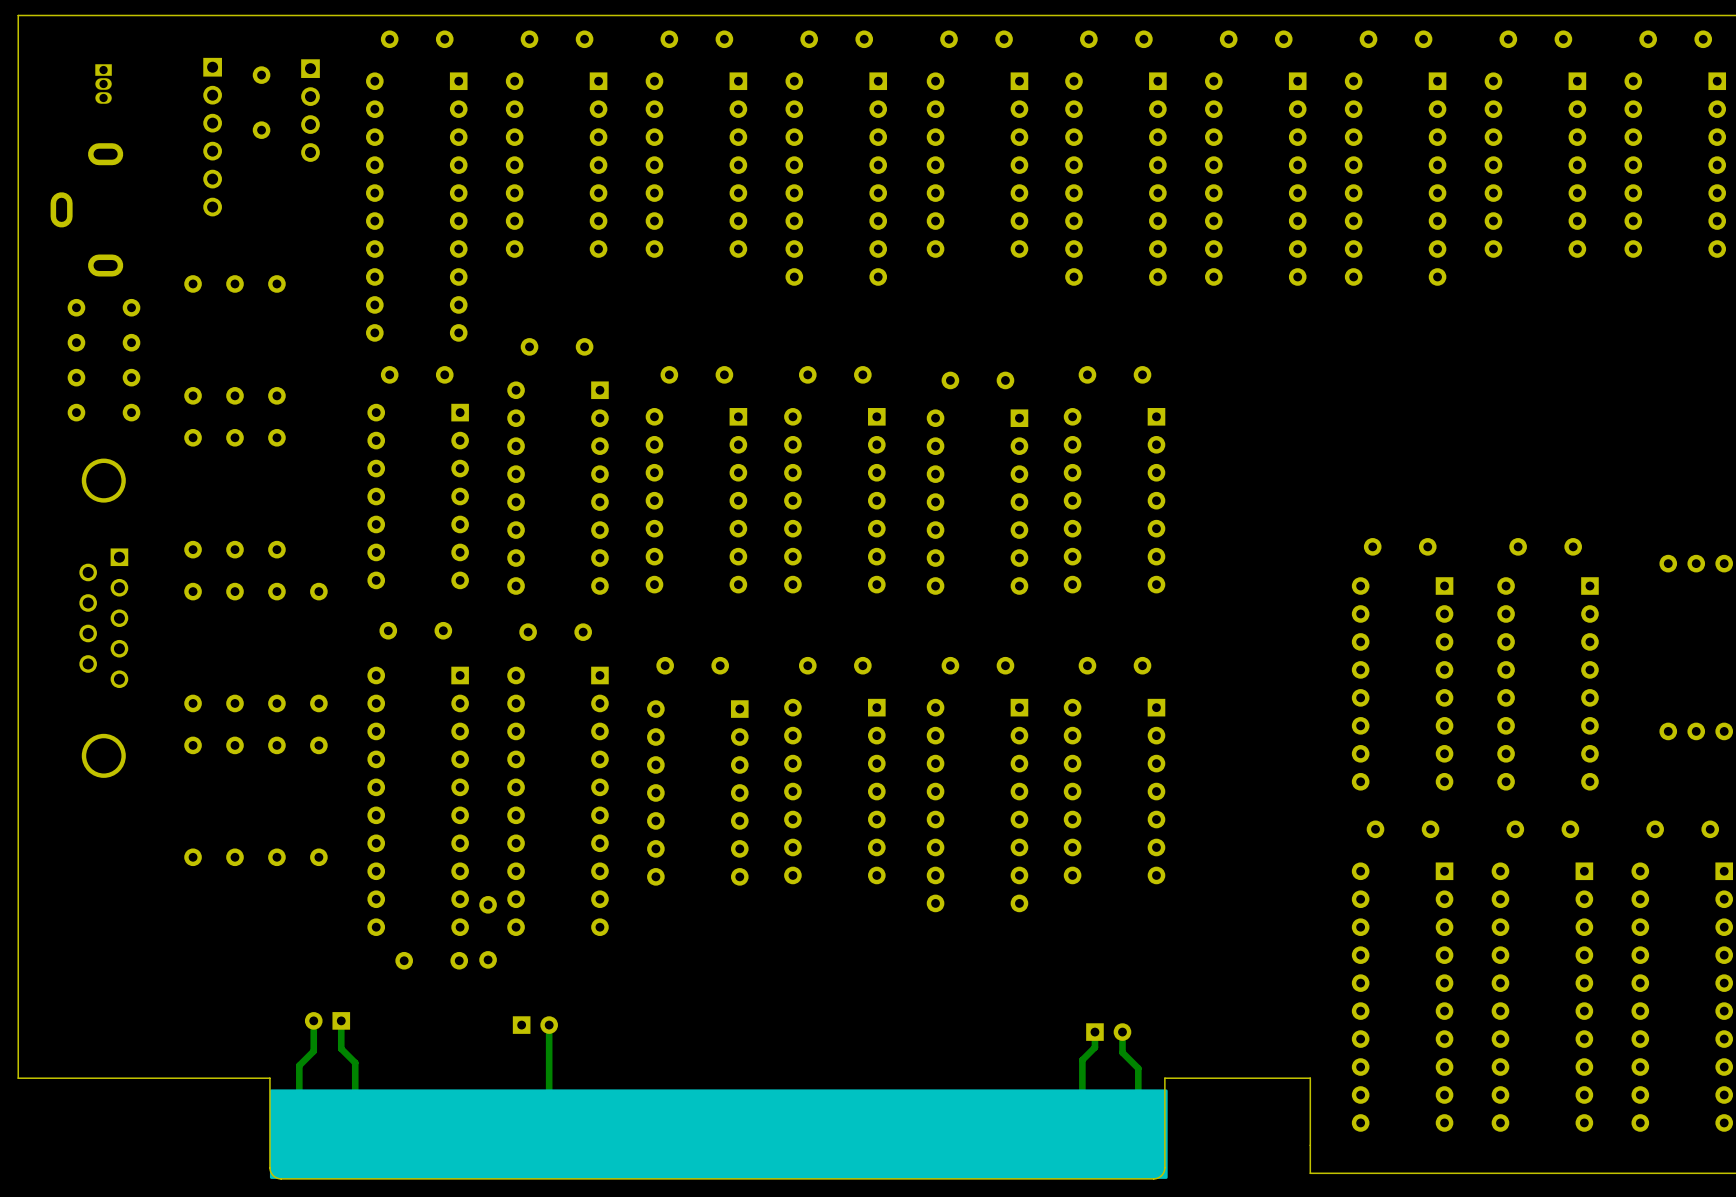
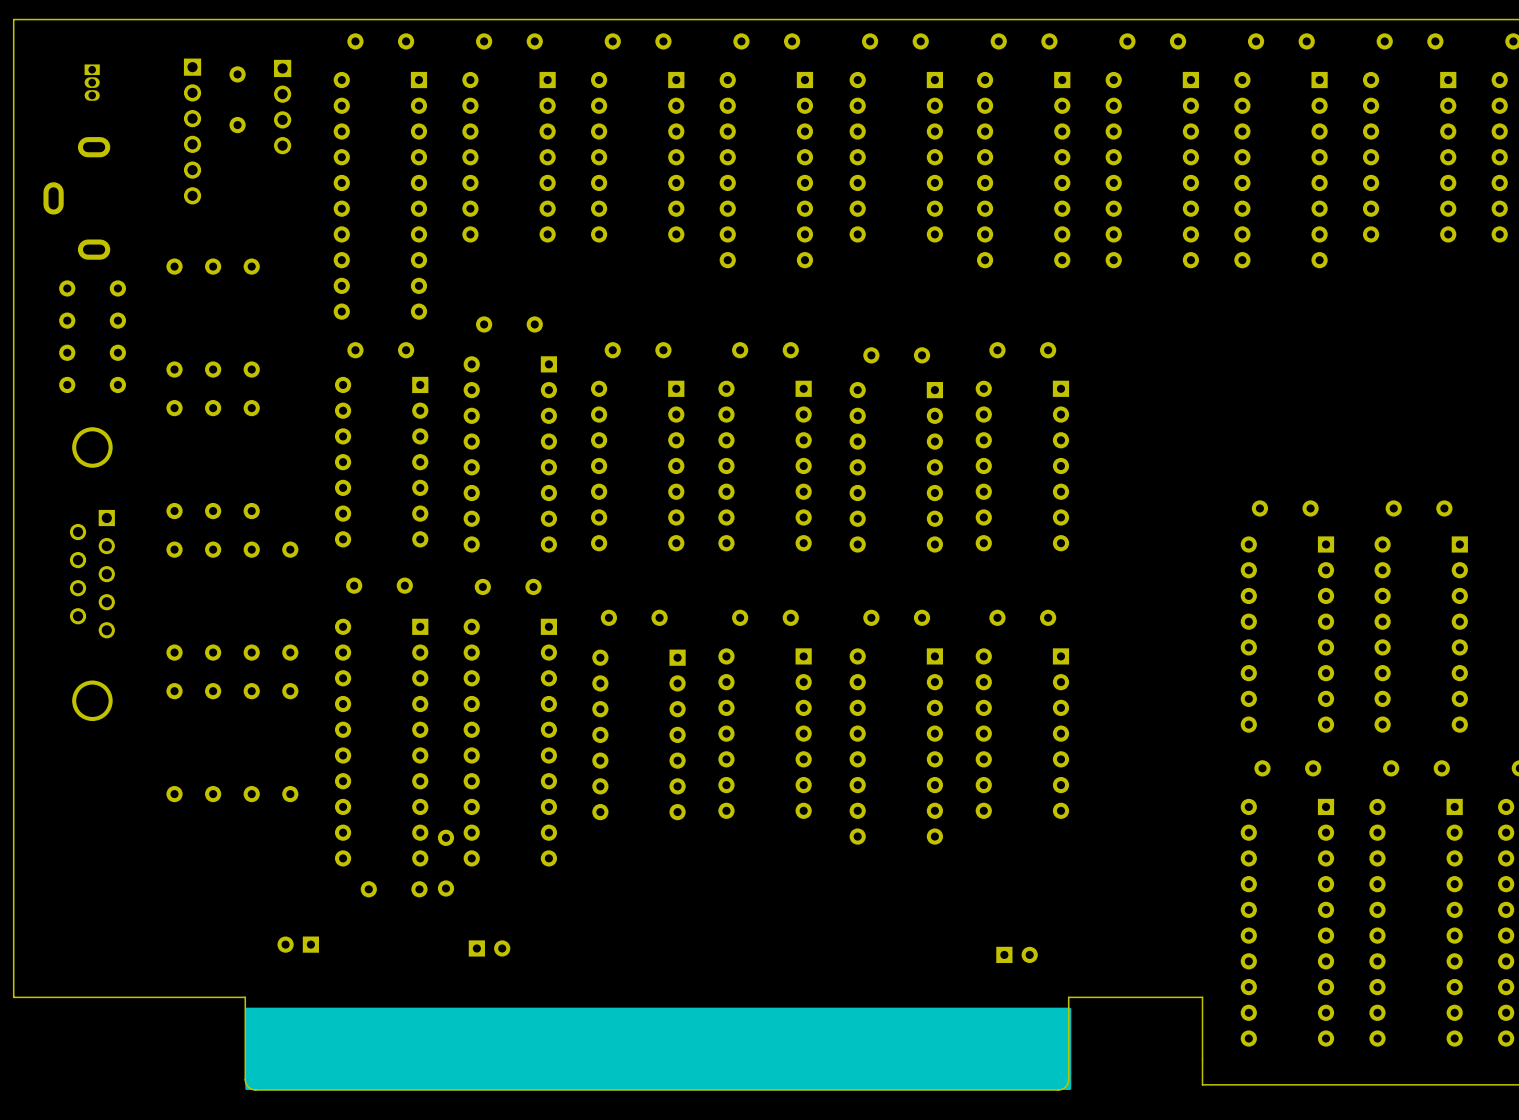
bottom track: (313, 1020) (313, 1051) (299, 1065) (299, 1132) -> none
bottom track: (341, 1020) (341, 1048) (355, 1062) (355, 1132) -> none
bottom track: (549, 1025) (549, 1130) (551, 1132) -> none
bottom track: (1094, 1032) (1094, 1047) (1082, 1060) (1082, 1132) -> none
bottom track: (1122, 1032) (1122, 1052) (1138, 1068) (1138, 1132) -> none

